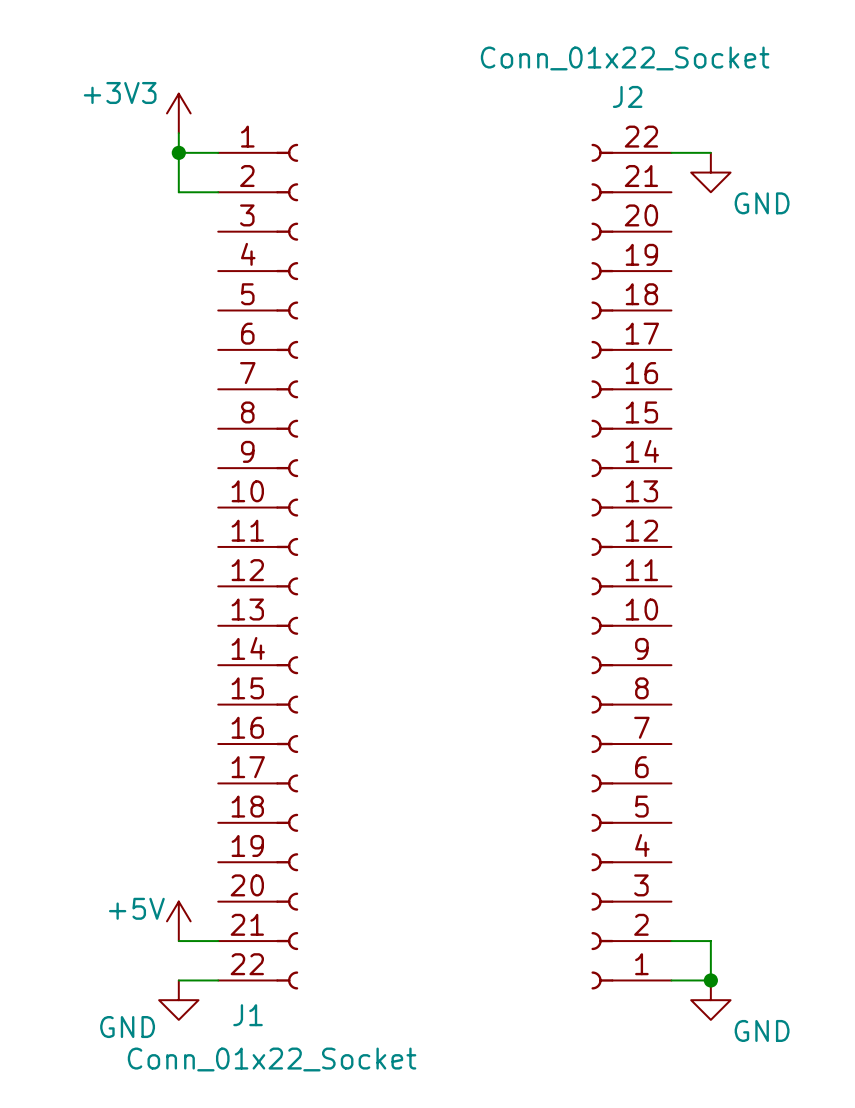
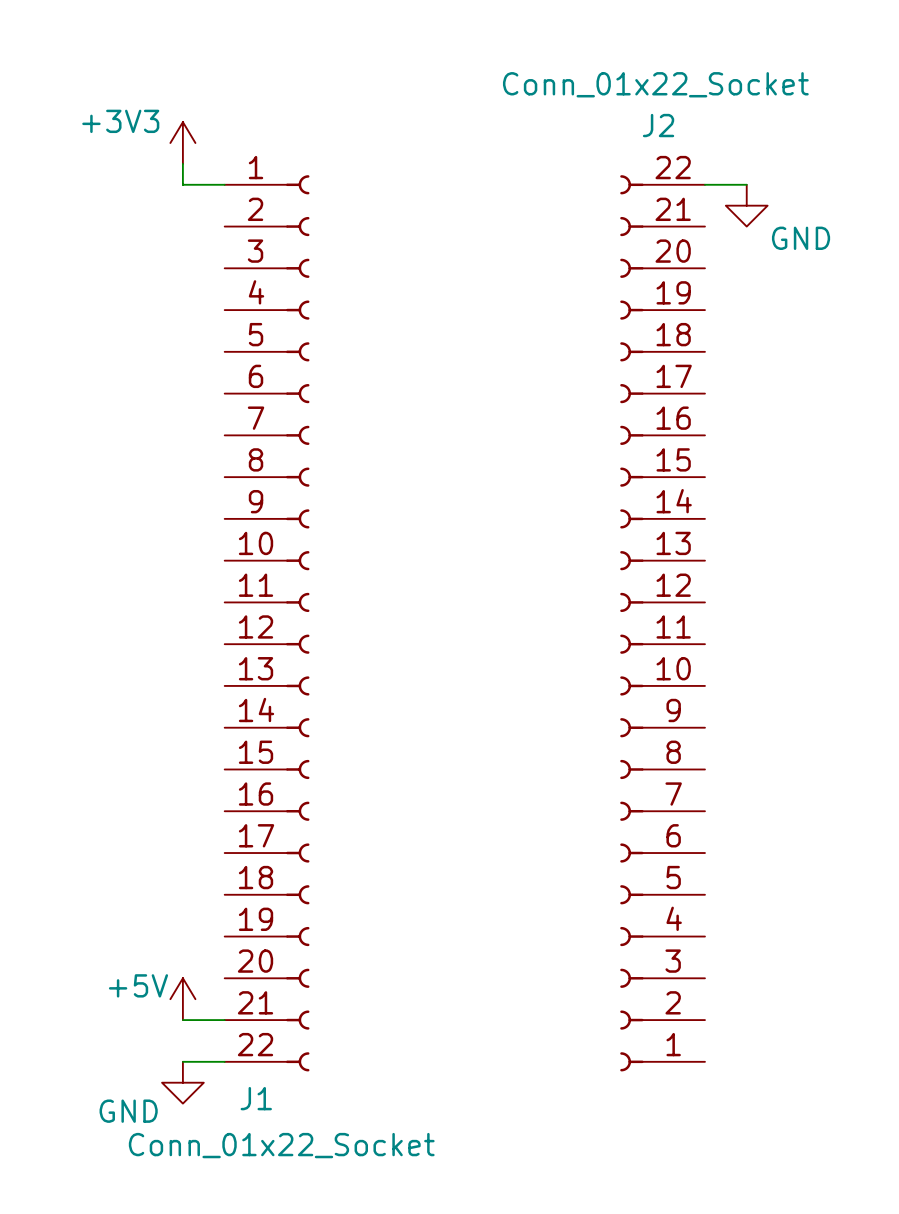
wire: (178, 152) (178, 192) (218, 192) -> none
junction: (178, 152) -> none
wire: (671, 941) (710, 941) (710, 980) (671, 980) -> none
junction: (710, 980) -> none
power symbol: GND (710, 1000) -> none

